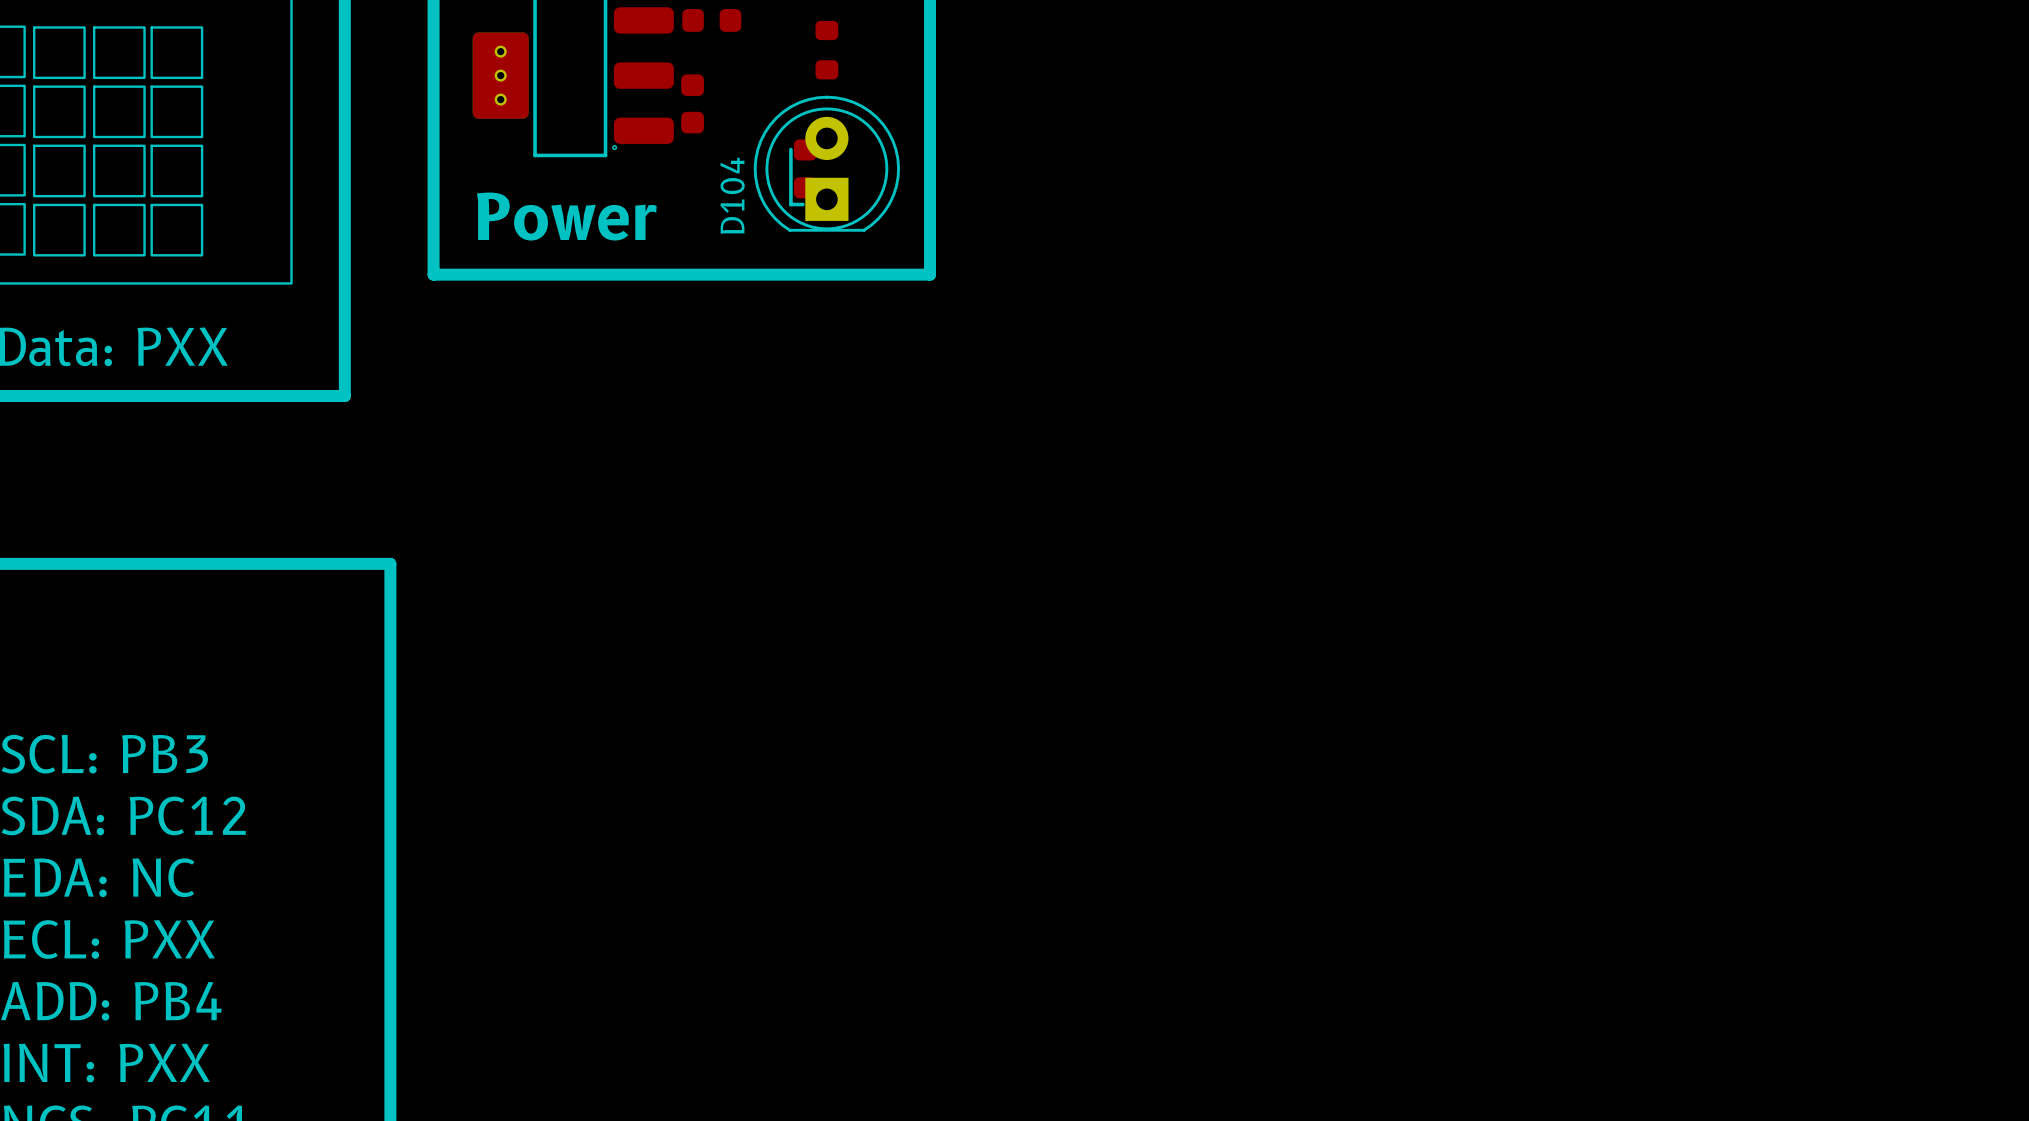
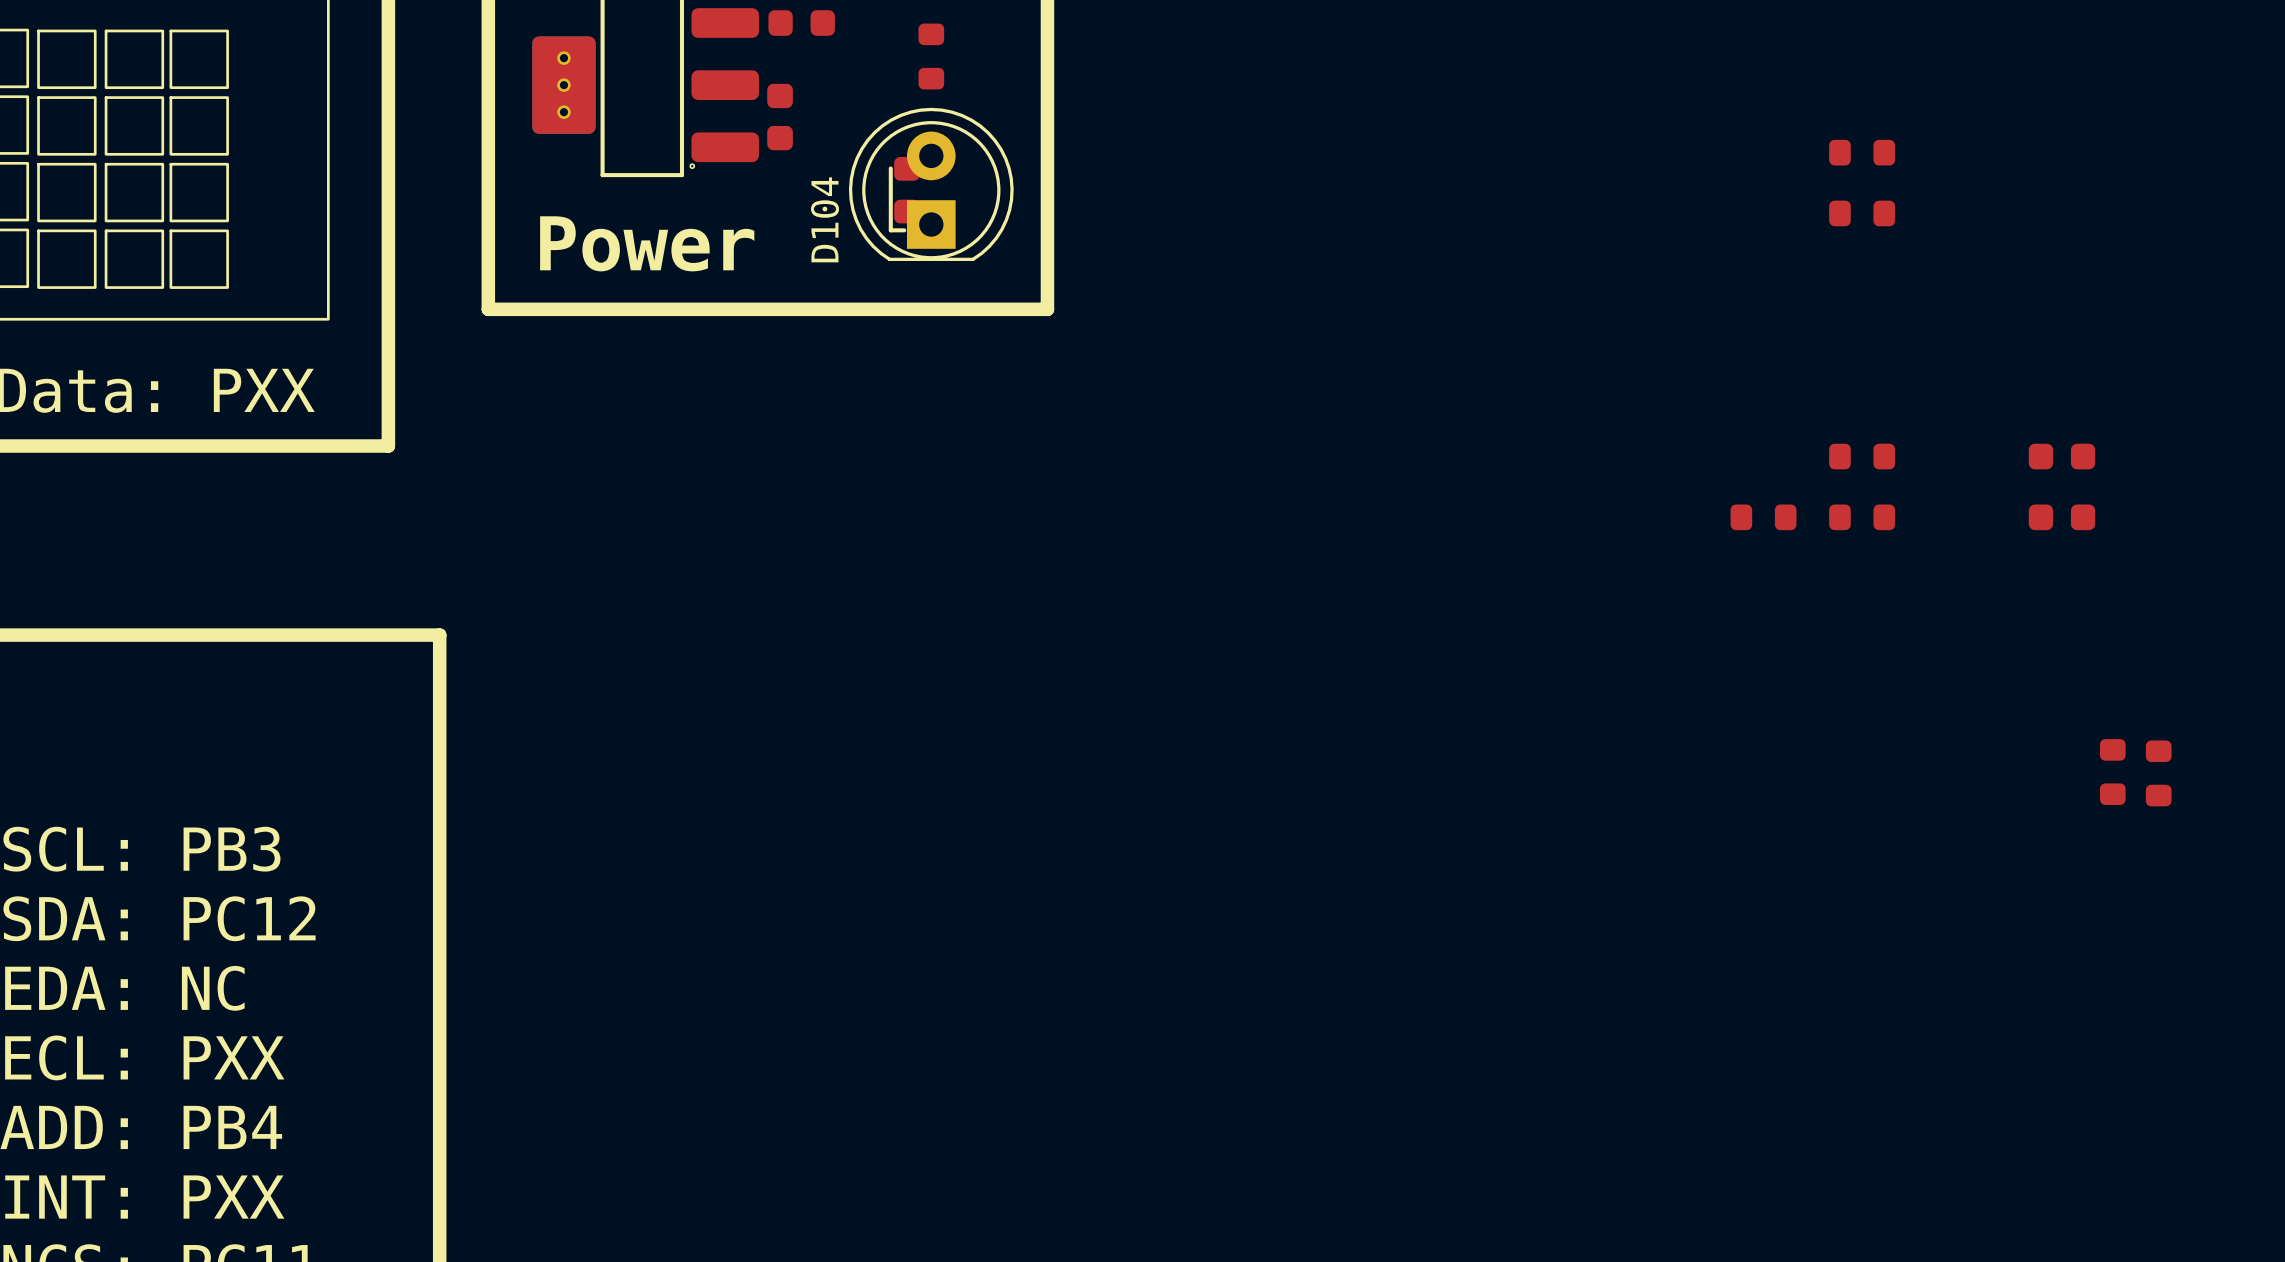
part: none -> (1862, 152)
part: none -> (1862, 213)
part: none -> (1862, 456)
part: none -> (2062, 456)
part: none -> (1763, 517)
part: none -> (1862, 517)
part: none -> (2062, 517)
part: none -> (2112, 772)
part: none -> (2158, 773)

